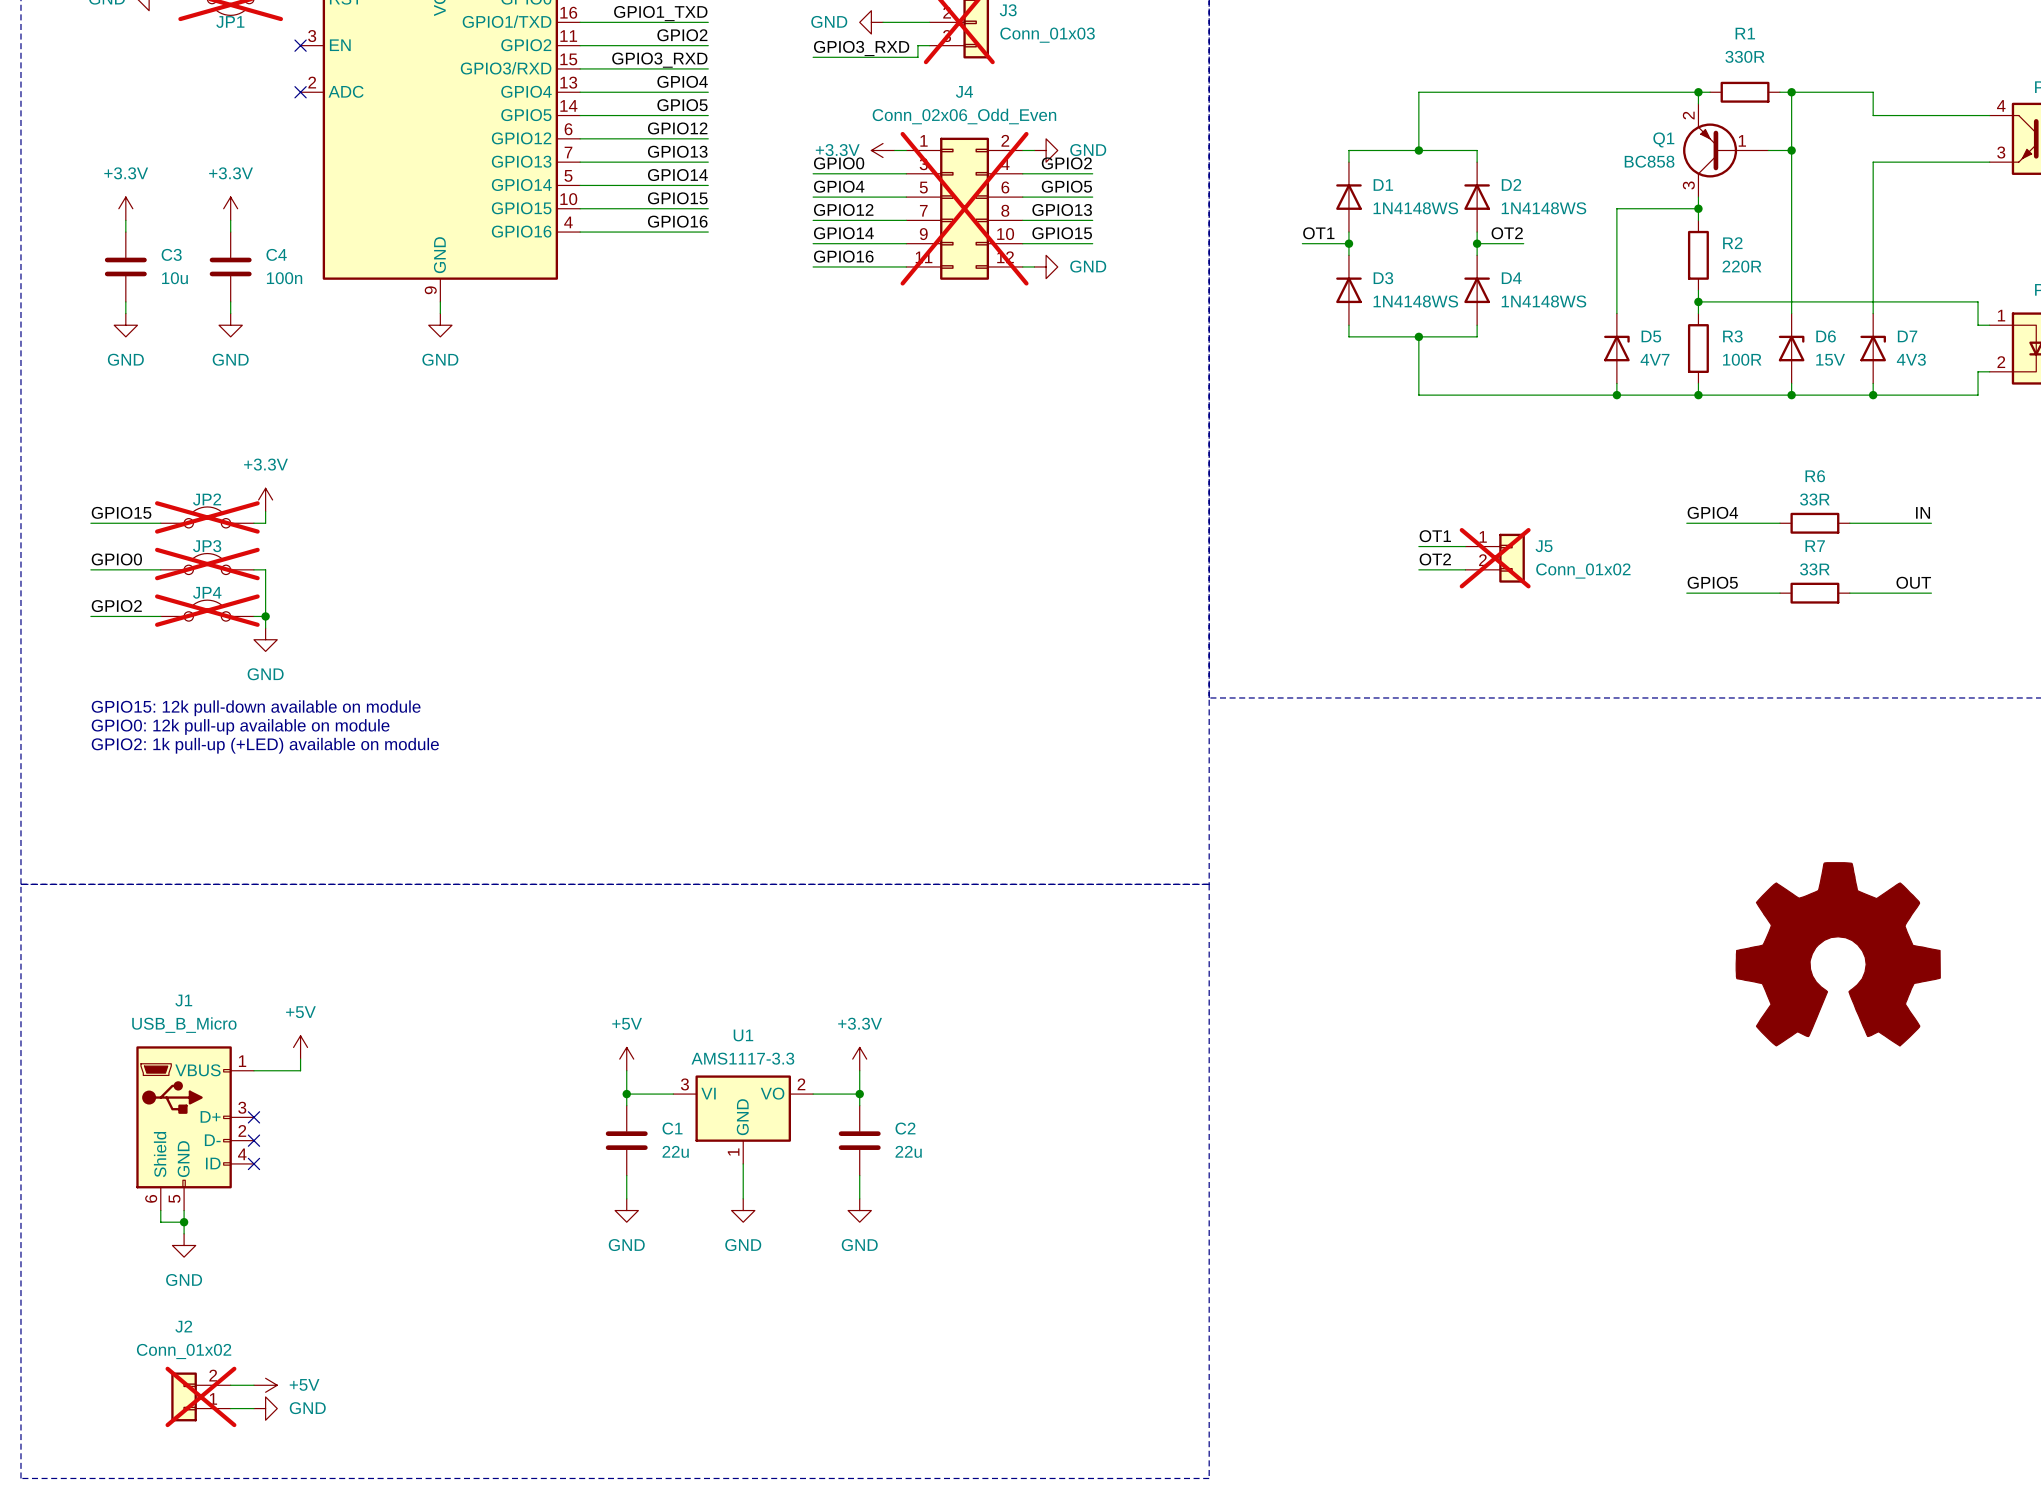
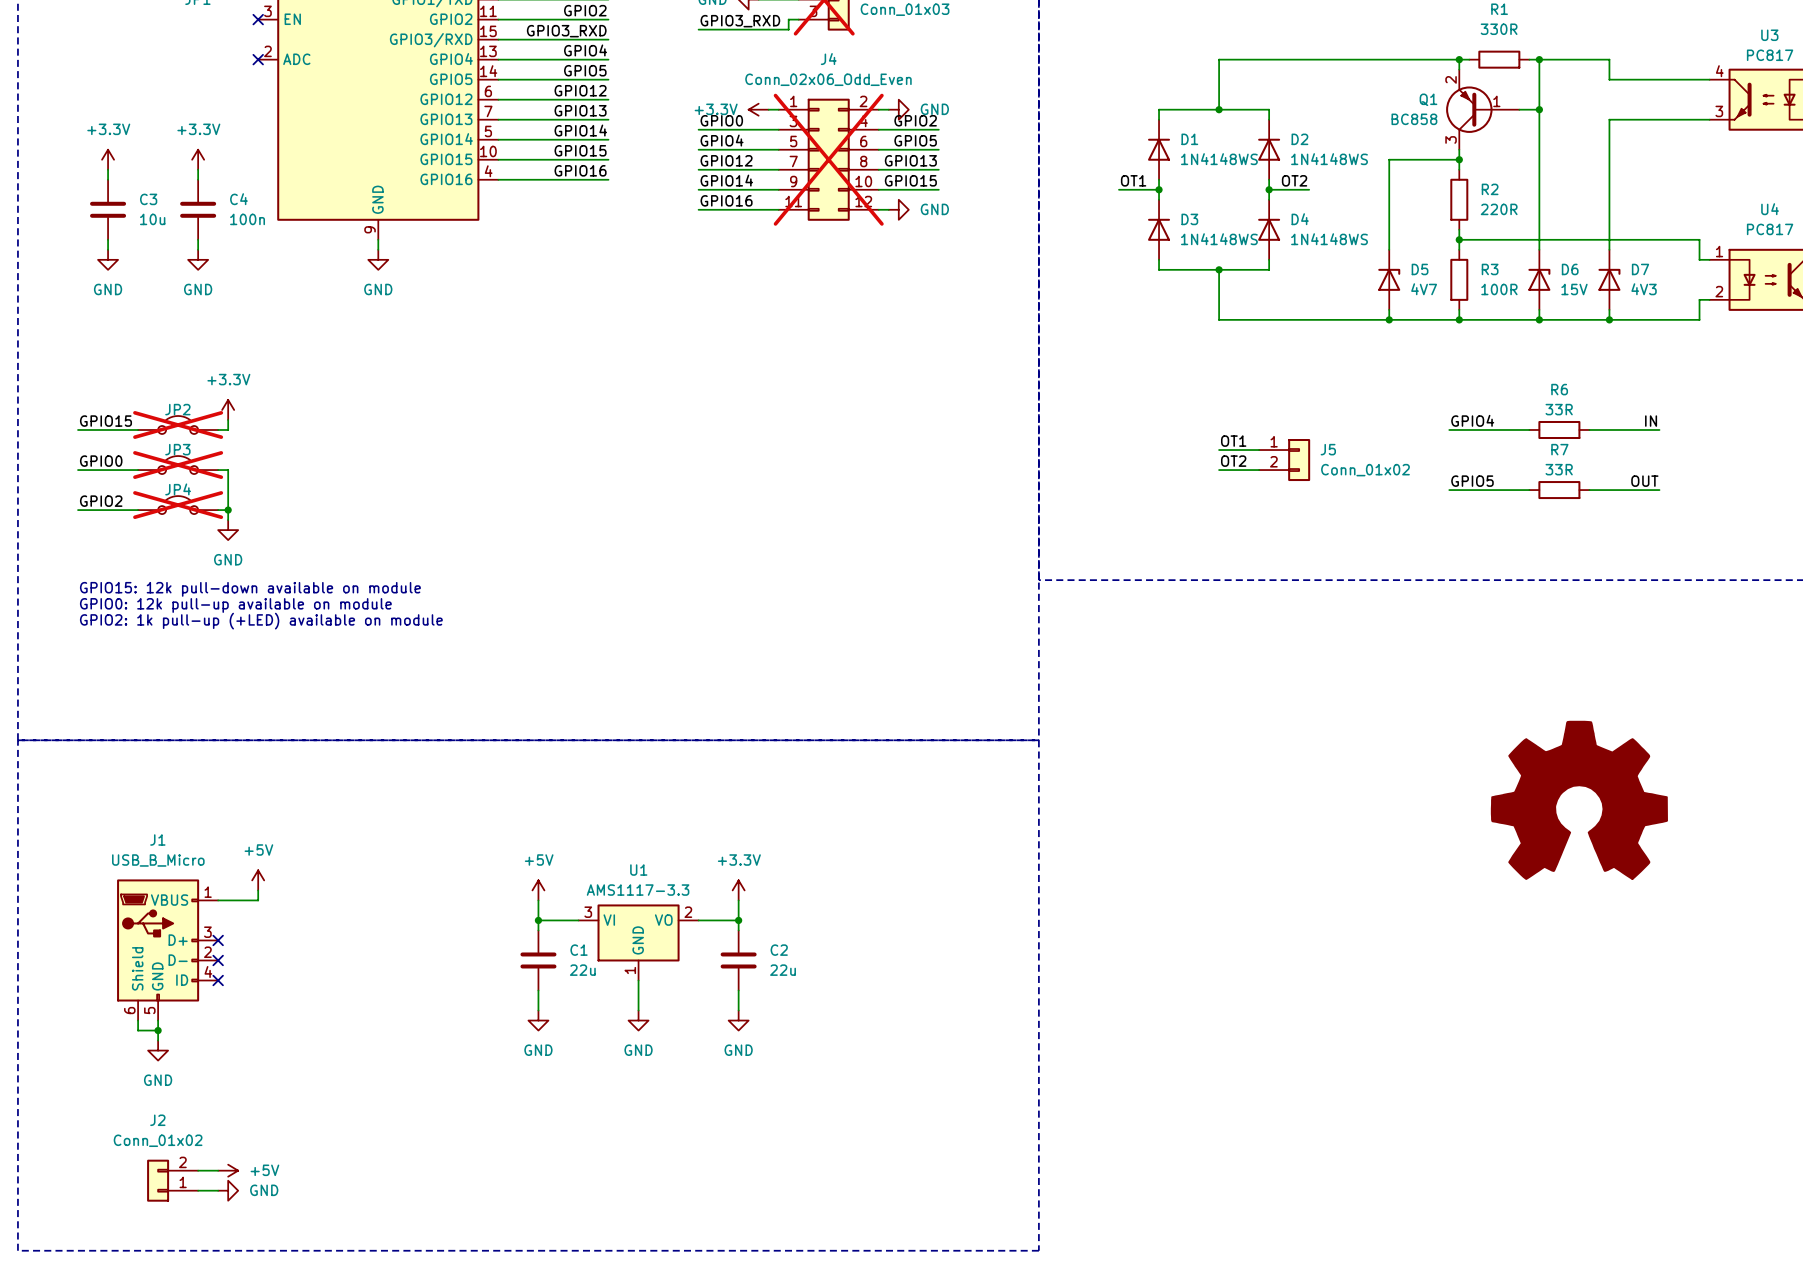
J5 do-not-place cross: (1495, 558) -> none
J2 do-not-place cross: (200, 1396) -> none

